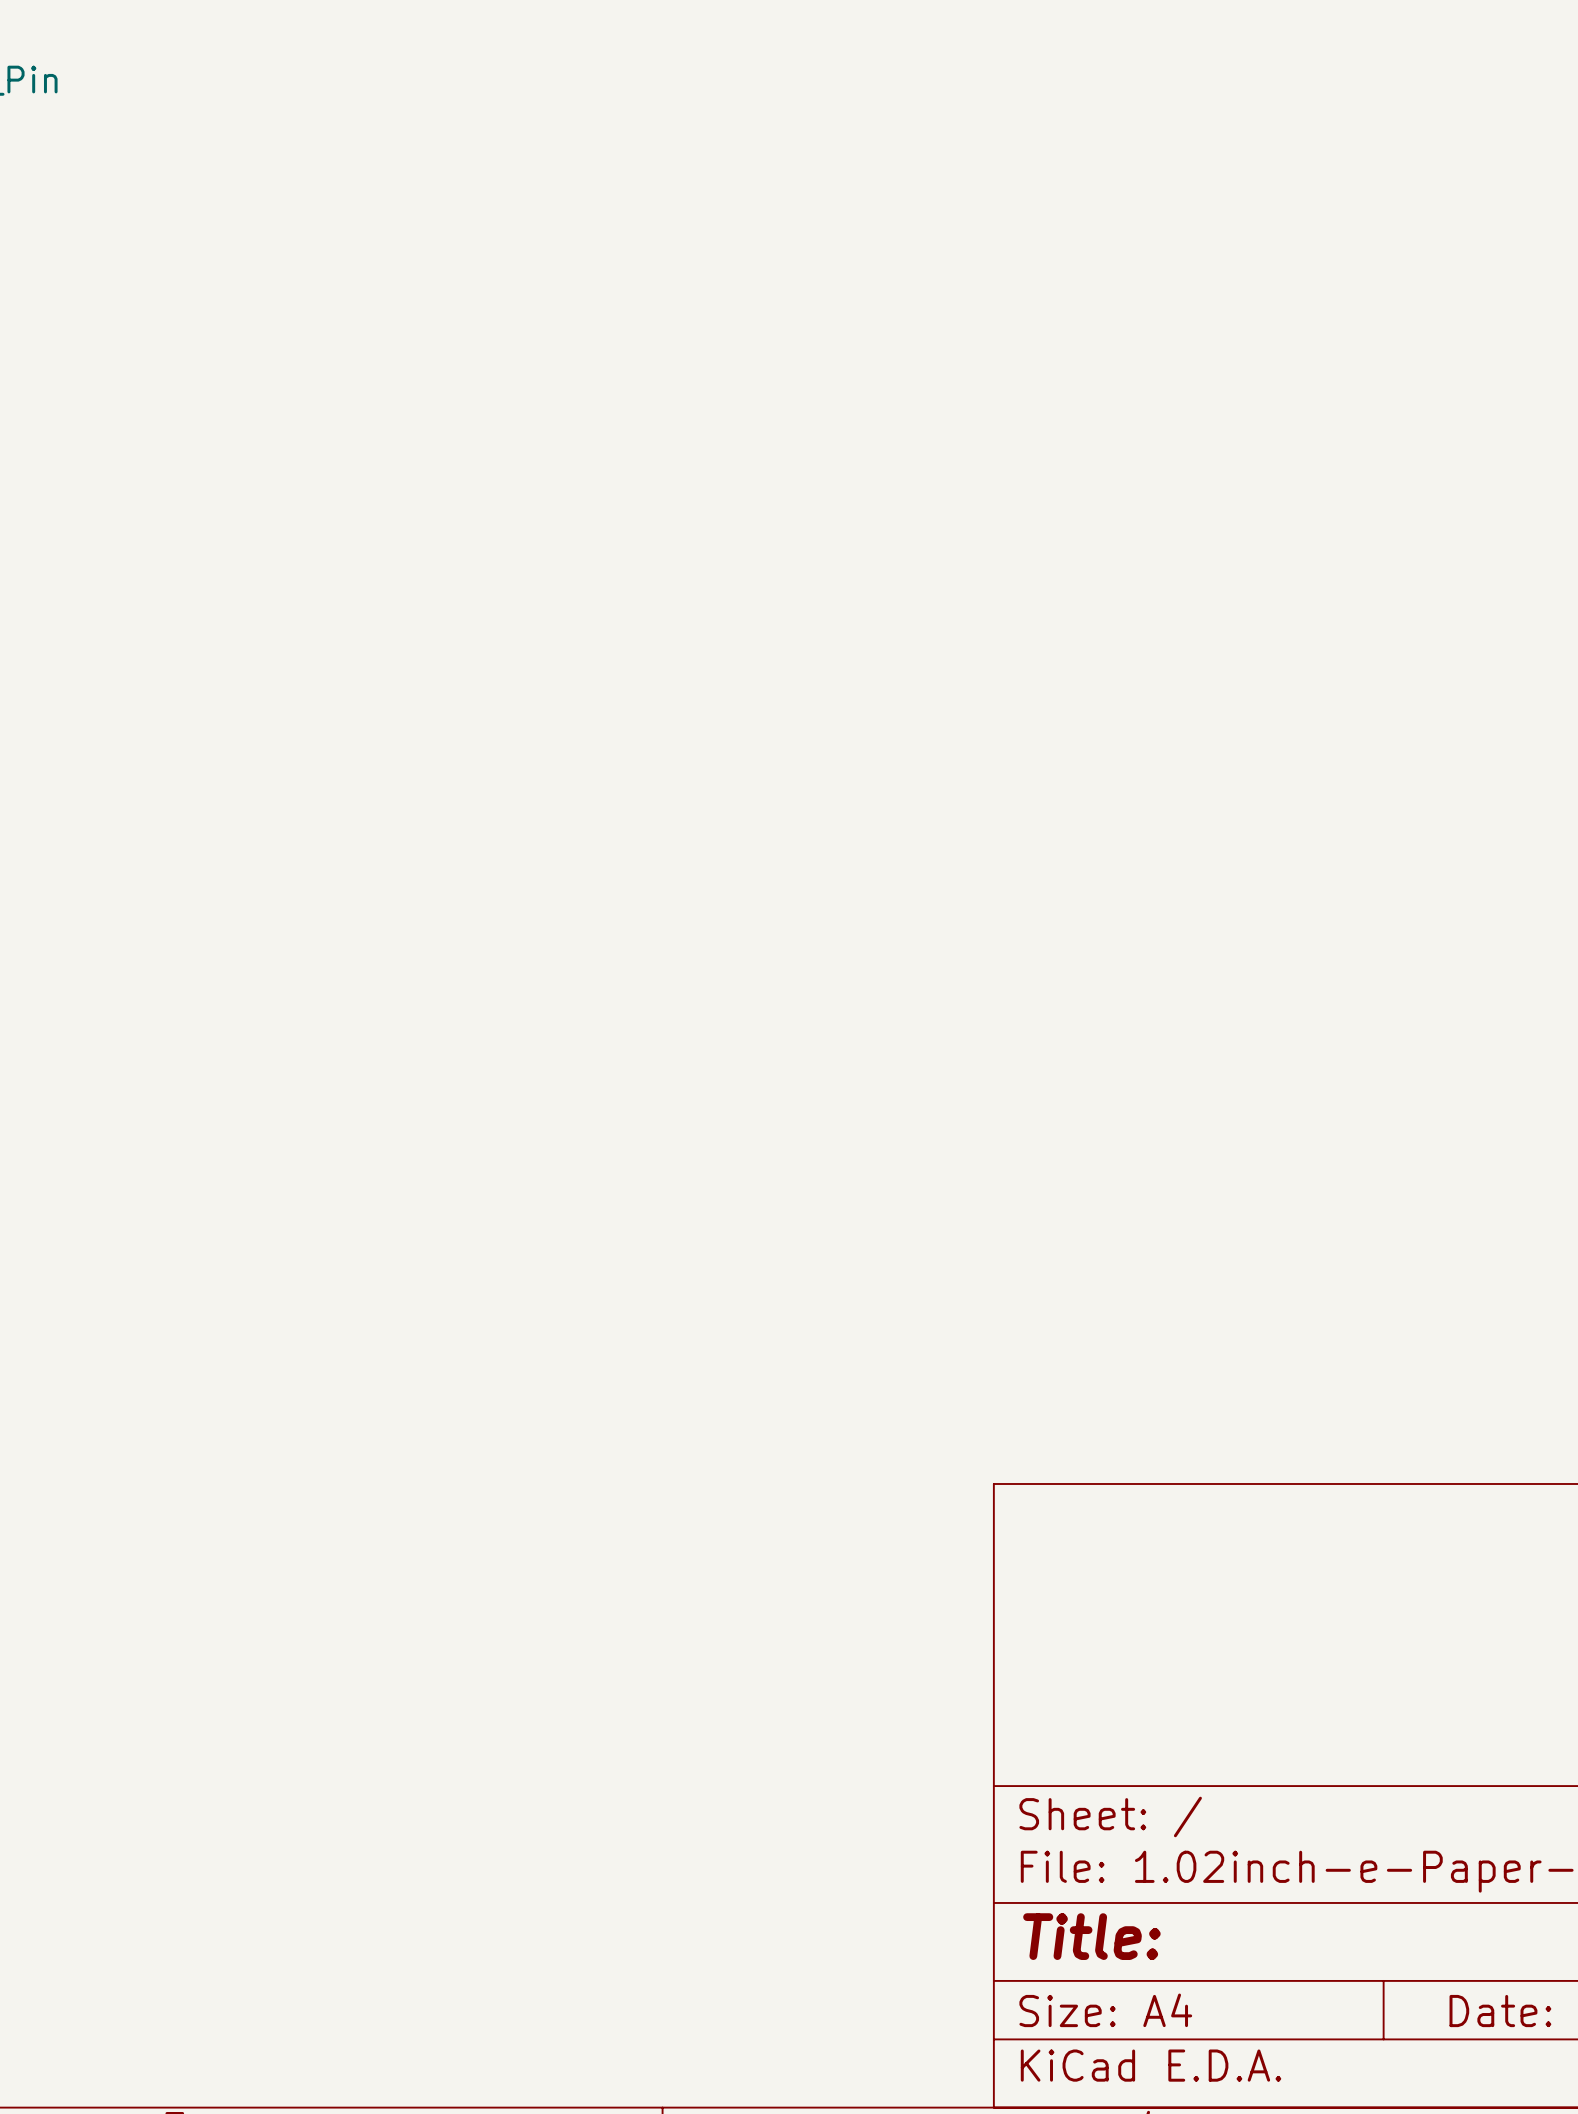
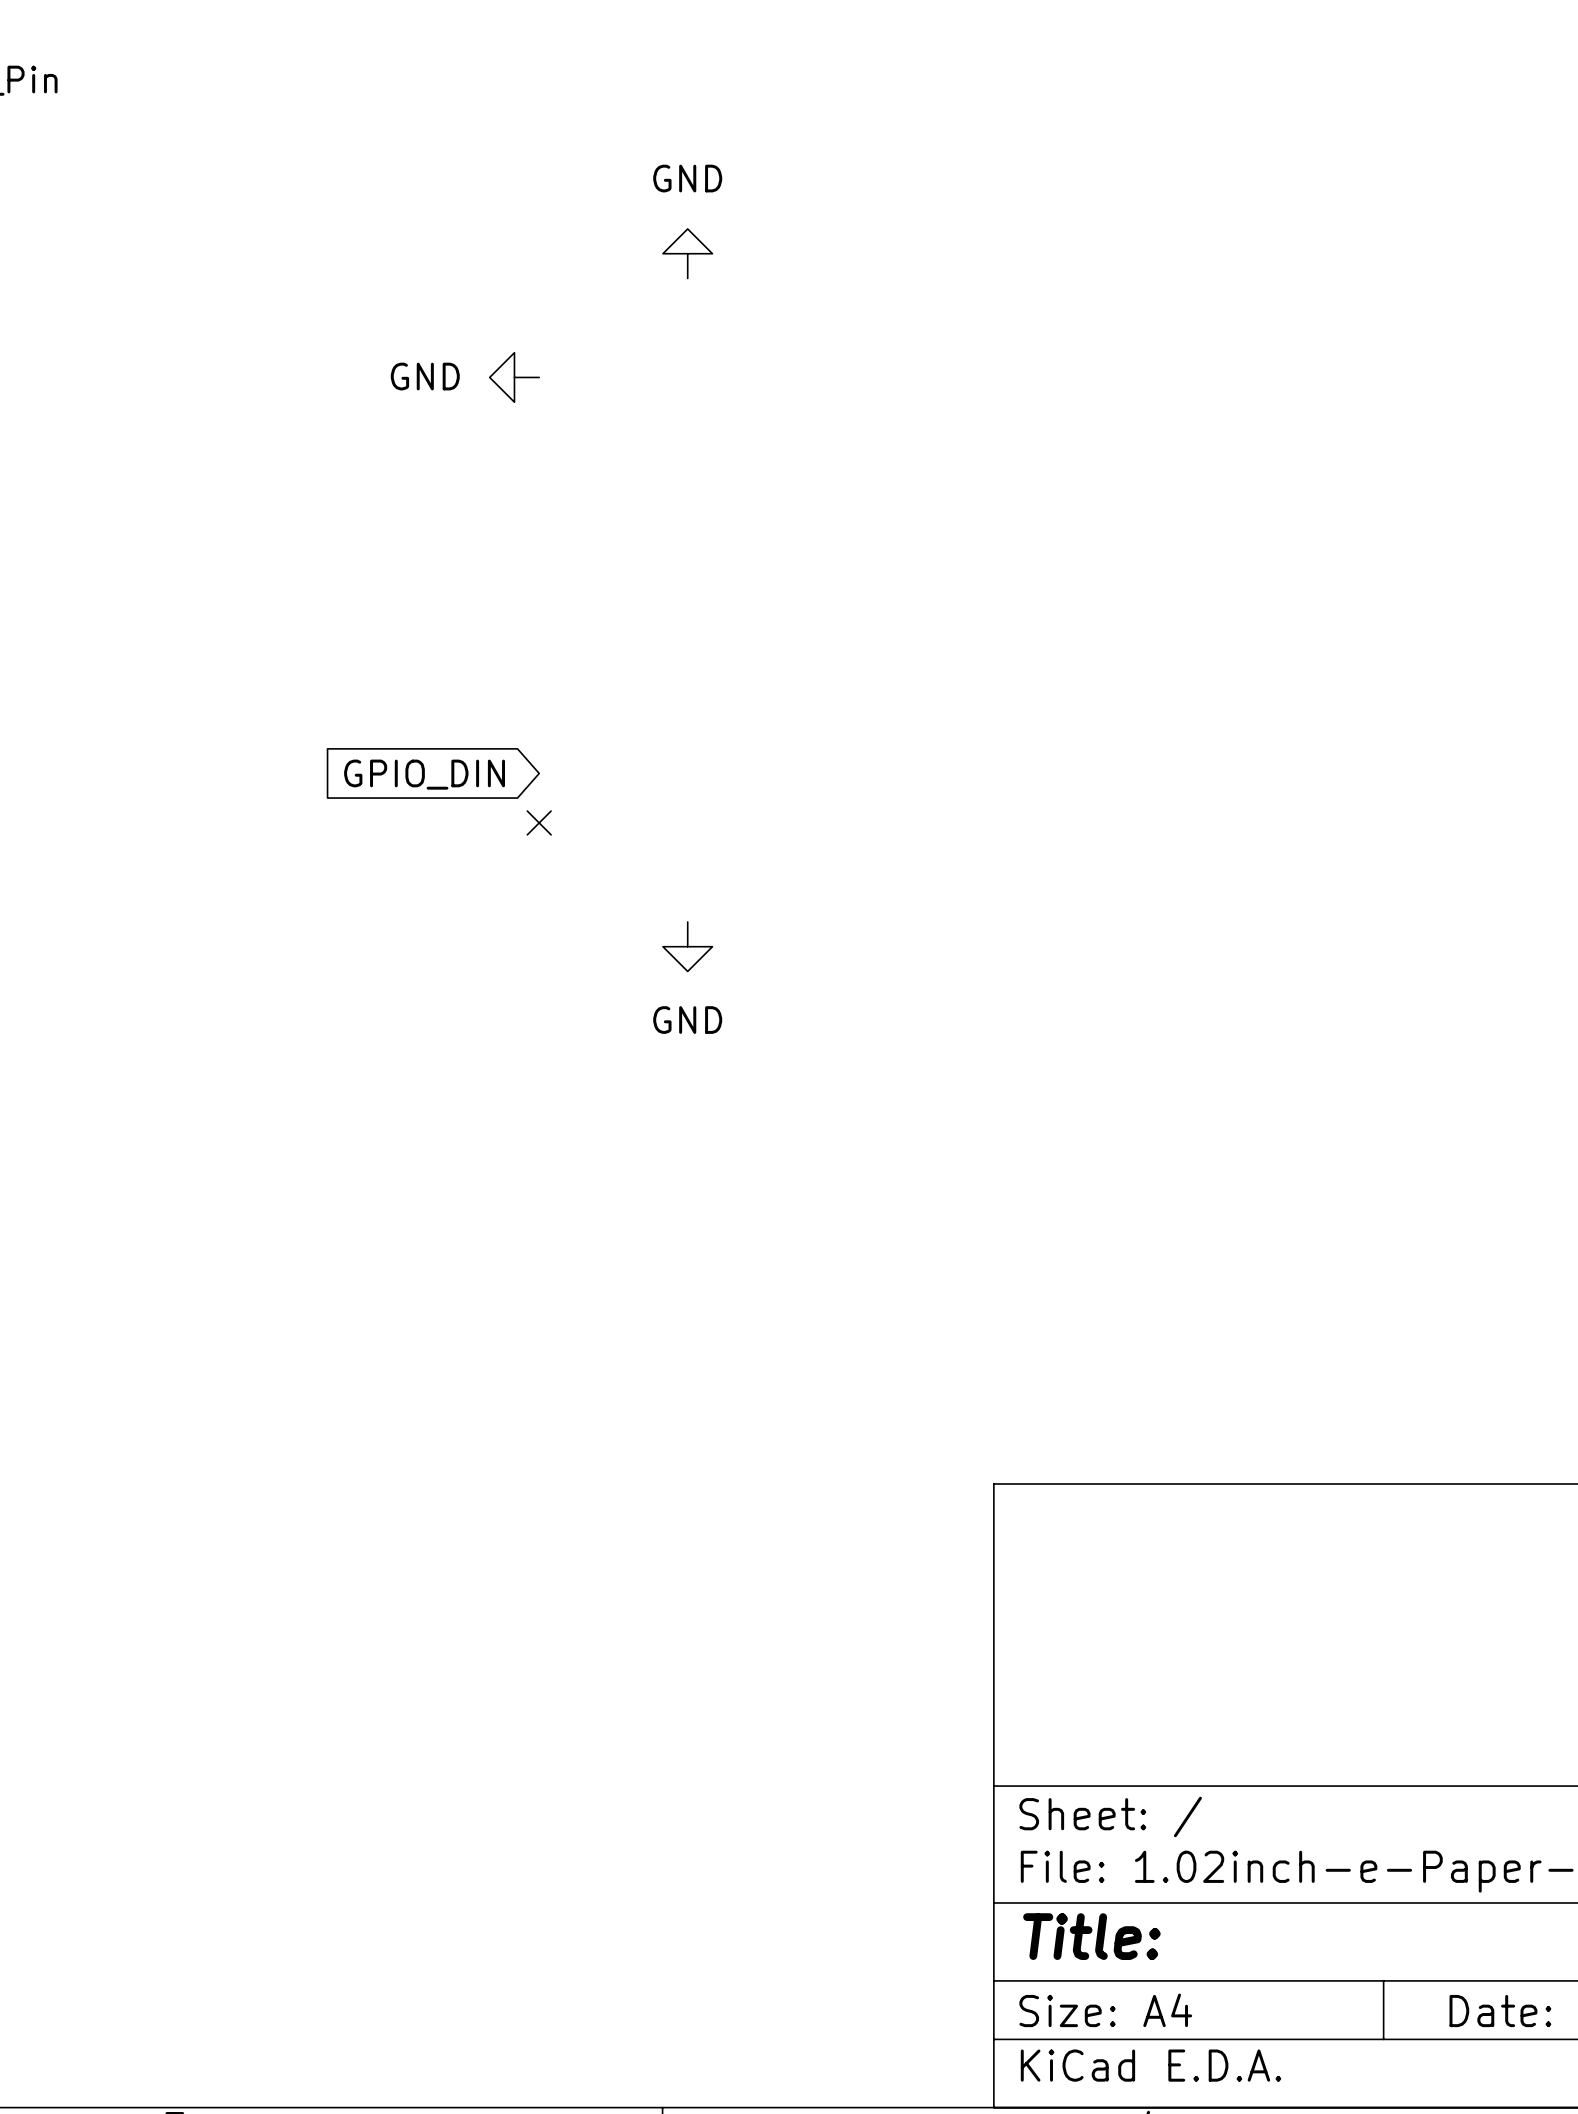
power symbol: none -> GND (687, 253)
power symbol: none -> GND (514, 377)
global label: none -> GPIO_DIN (424, 774)
no-connect mark: none -> (539, 822)
power symbol: none -> GND (687, 946)

